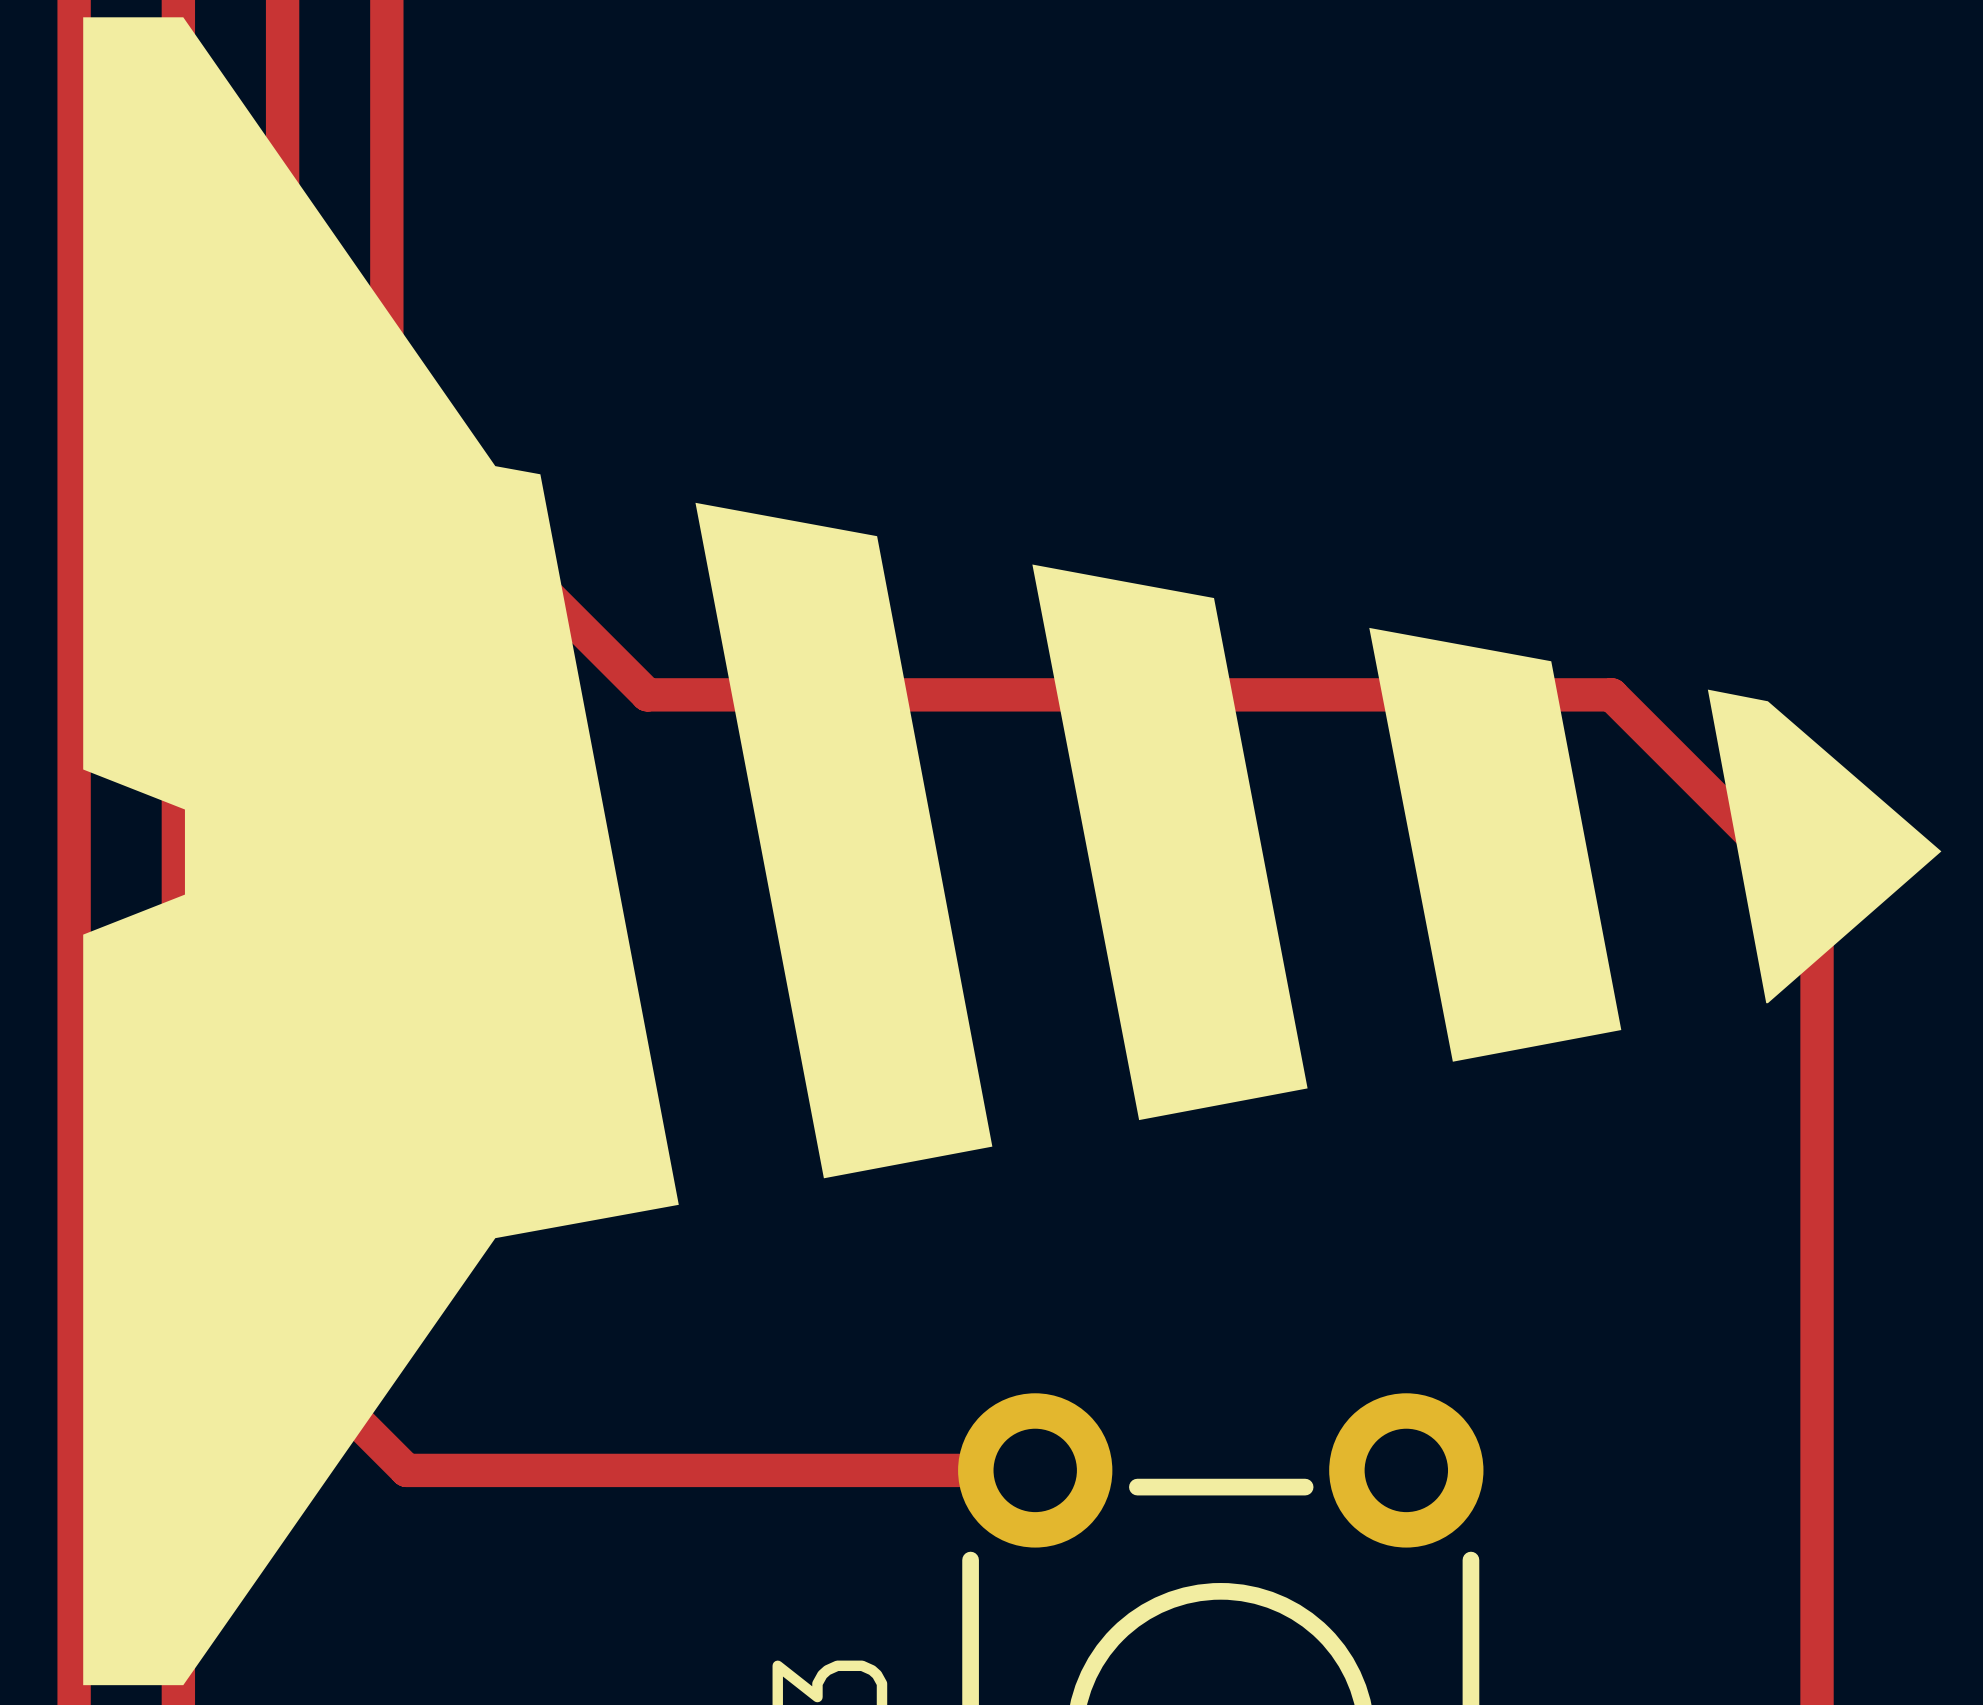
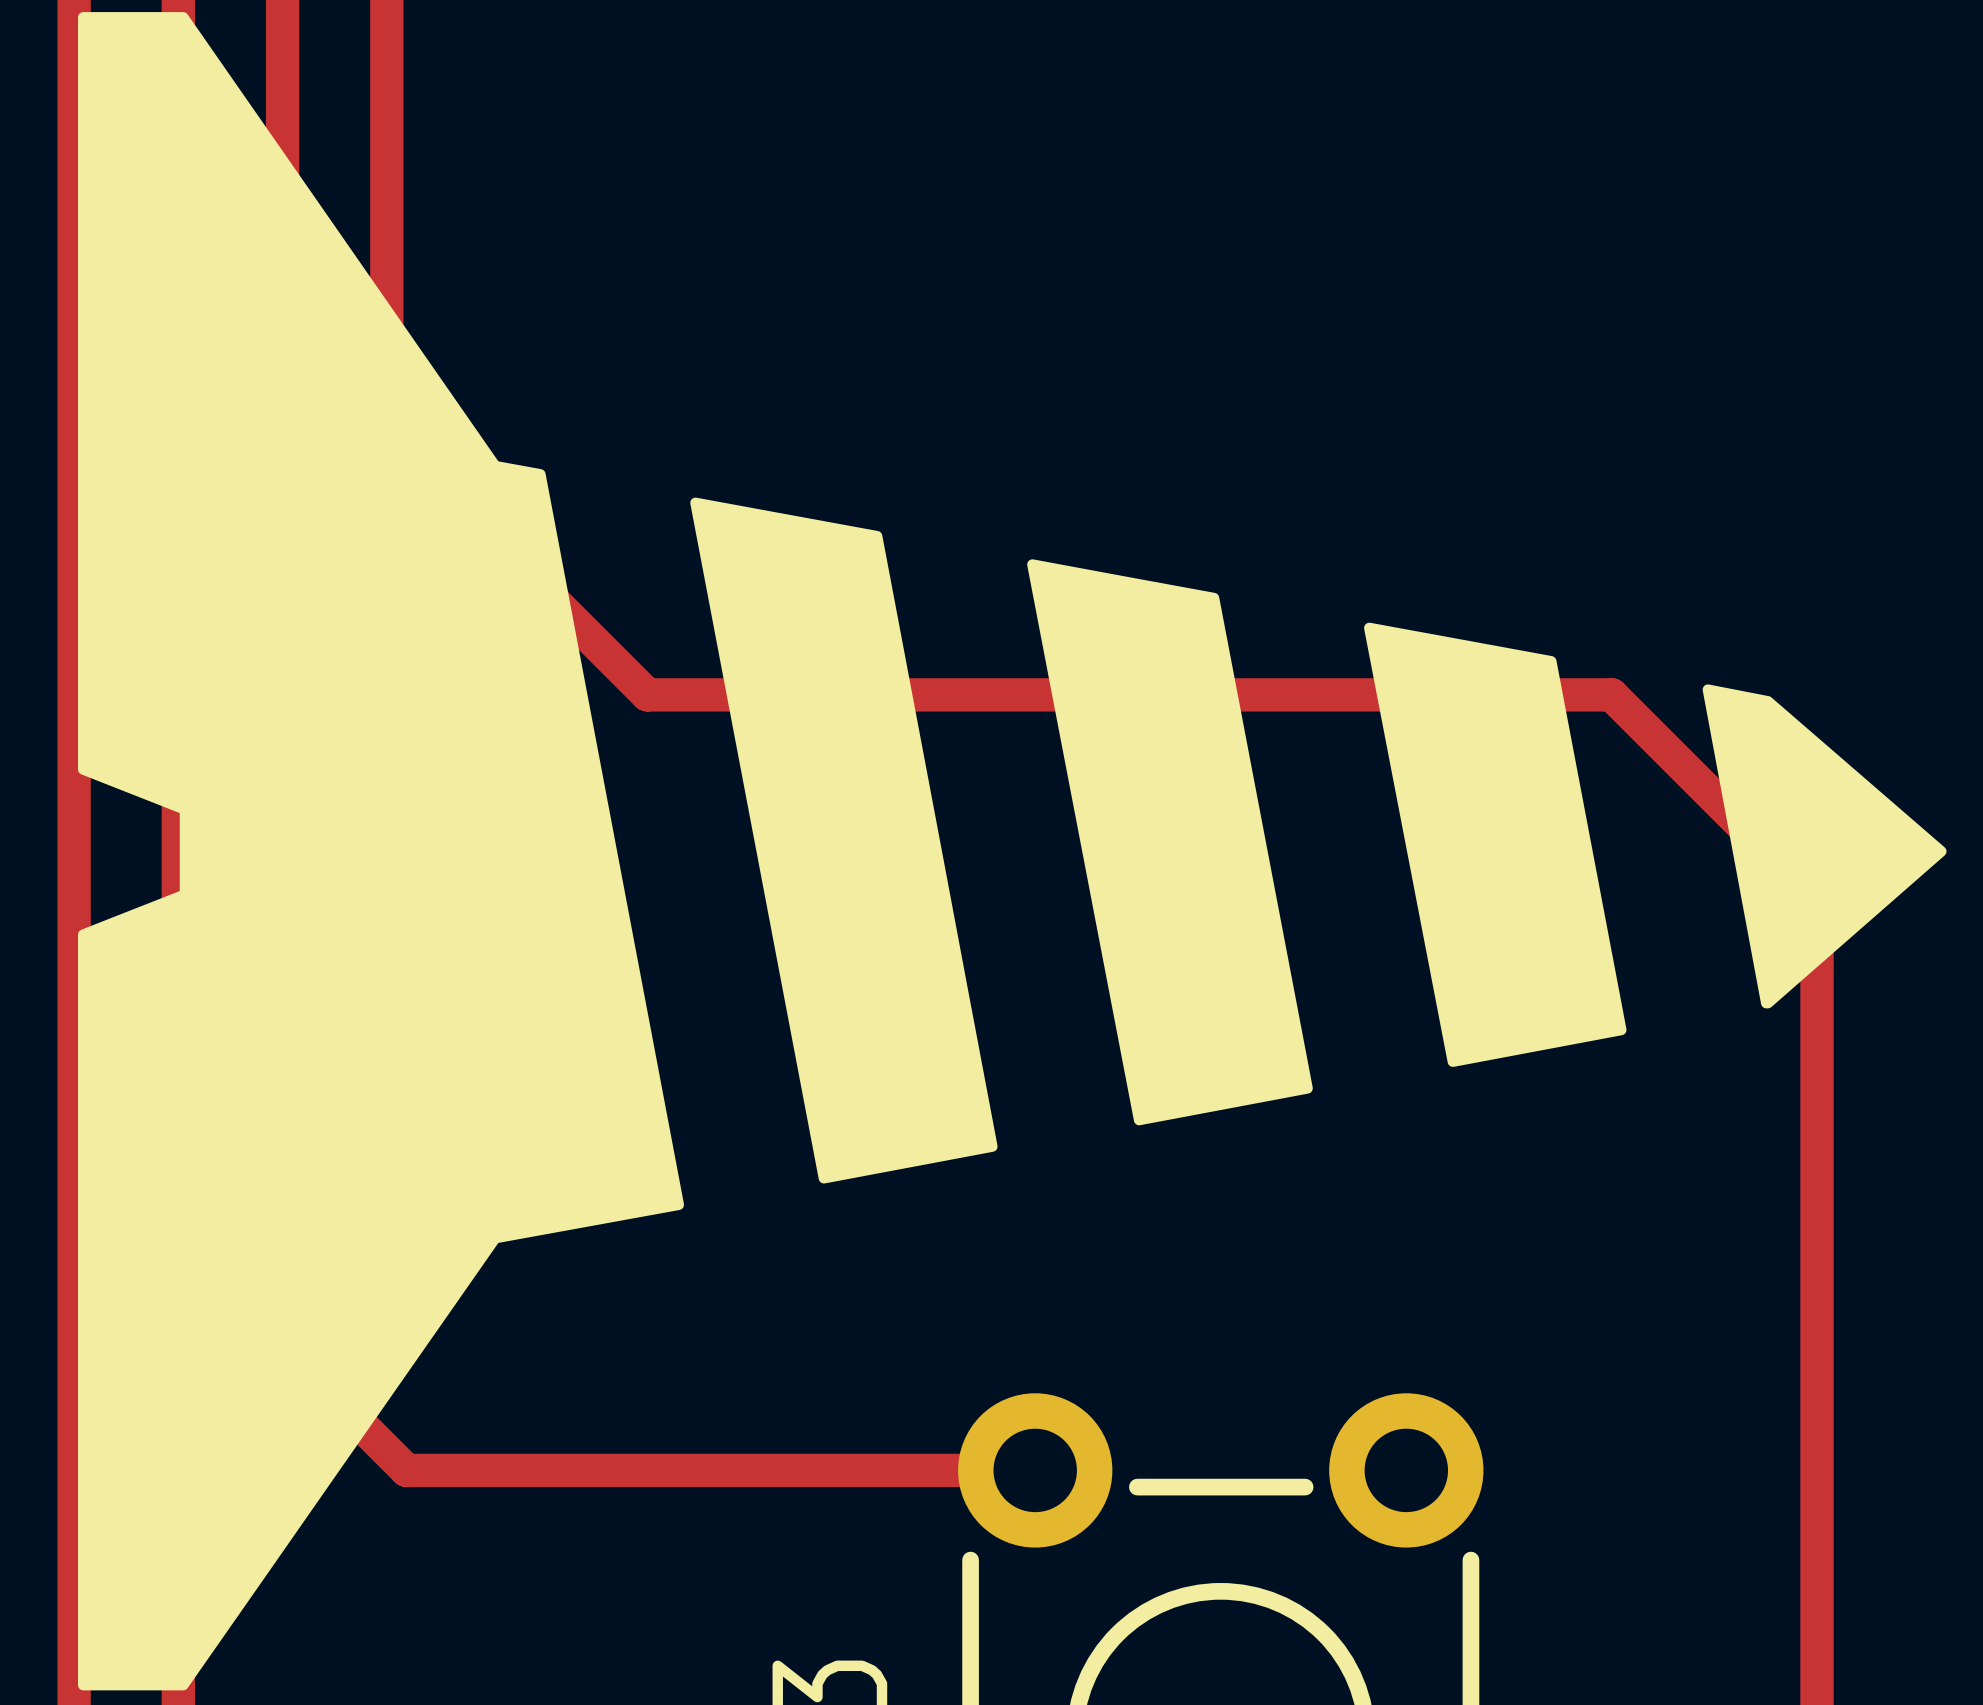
drawing shape: [83, 17, 1942, 1686] -> [77, 12, 1947, 1691]

